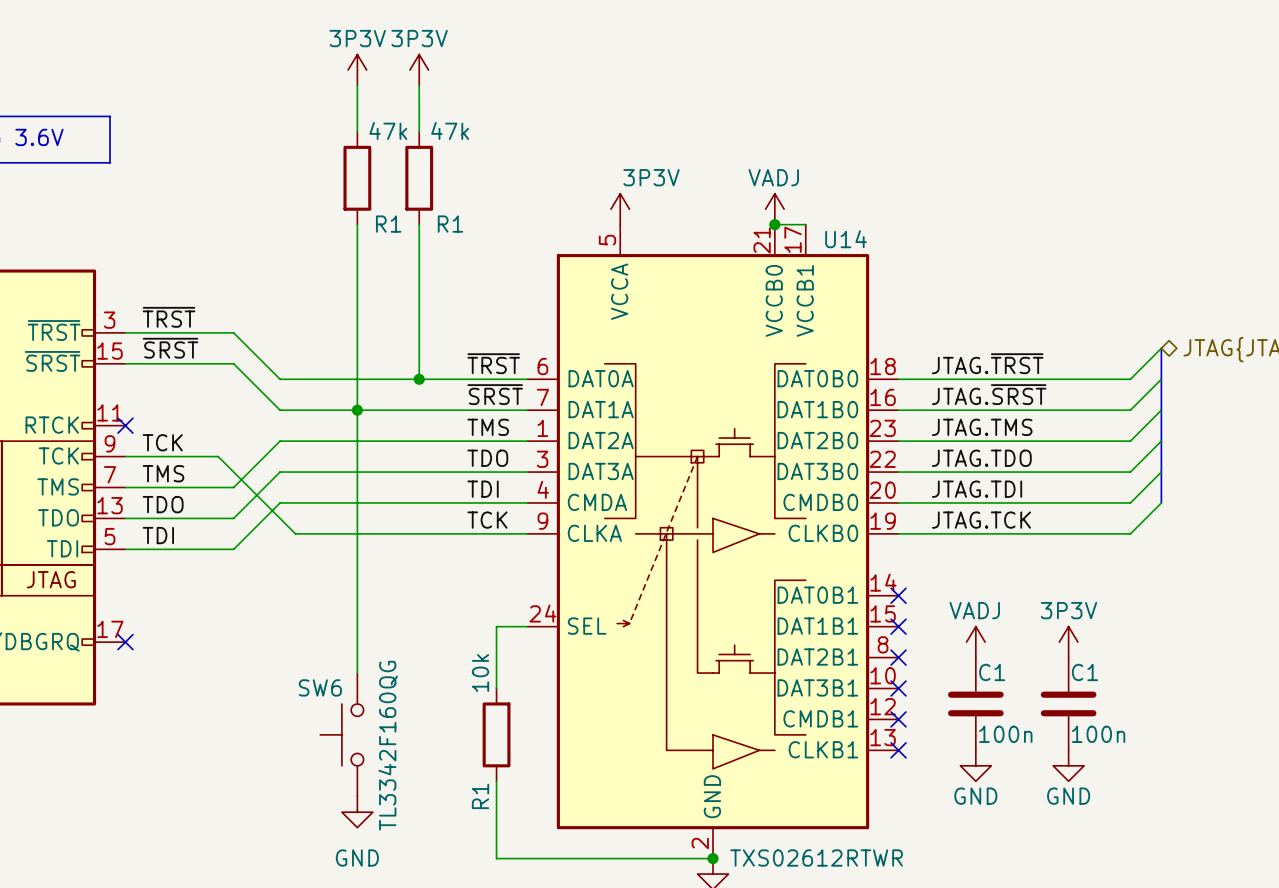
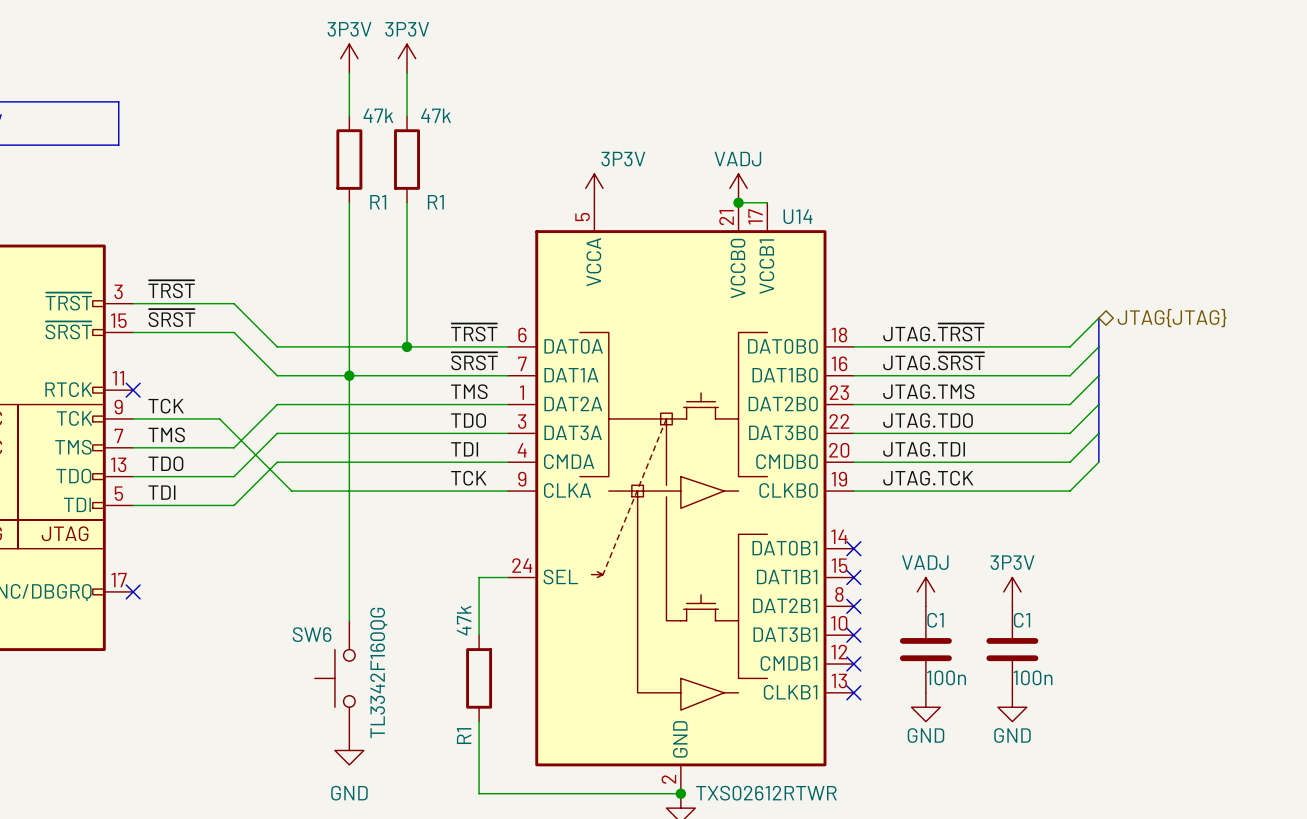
R1 value: 10k (480, 673) -> 47k (464, 620)

